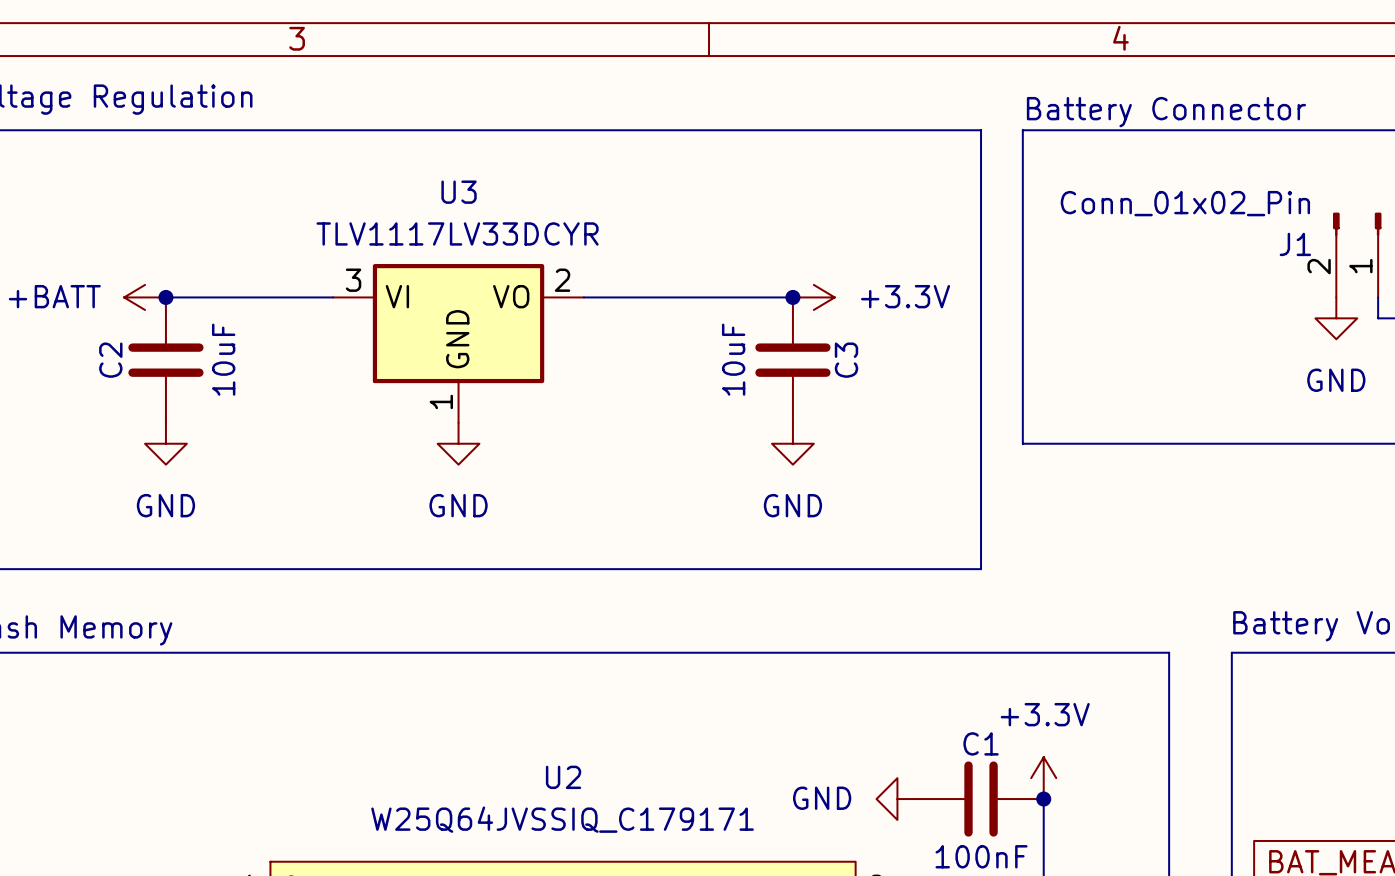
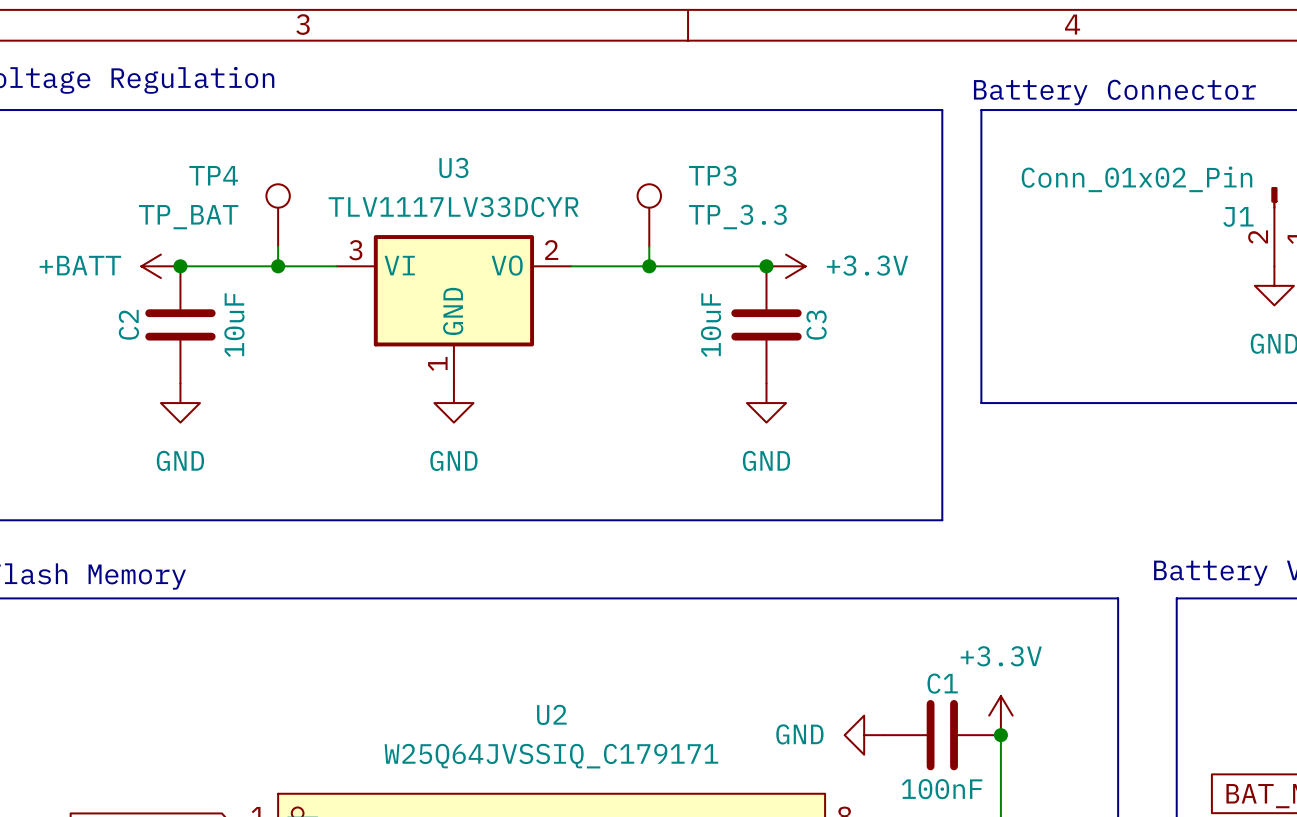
TP4: none -> TP_BAT (278, 215)
TP3: none -> TP_3.3 (649, 215)
wire: none -> (278, 246) (278, 266)
wire: none -> (649, 246) (649, 266)
junction: none -> (278, 266)
junction: none -> (649, 266)

